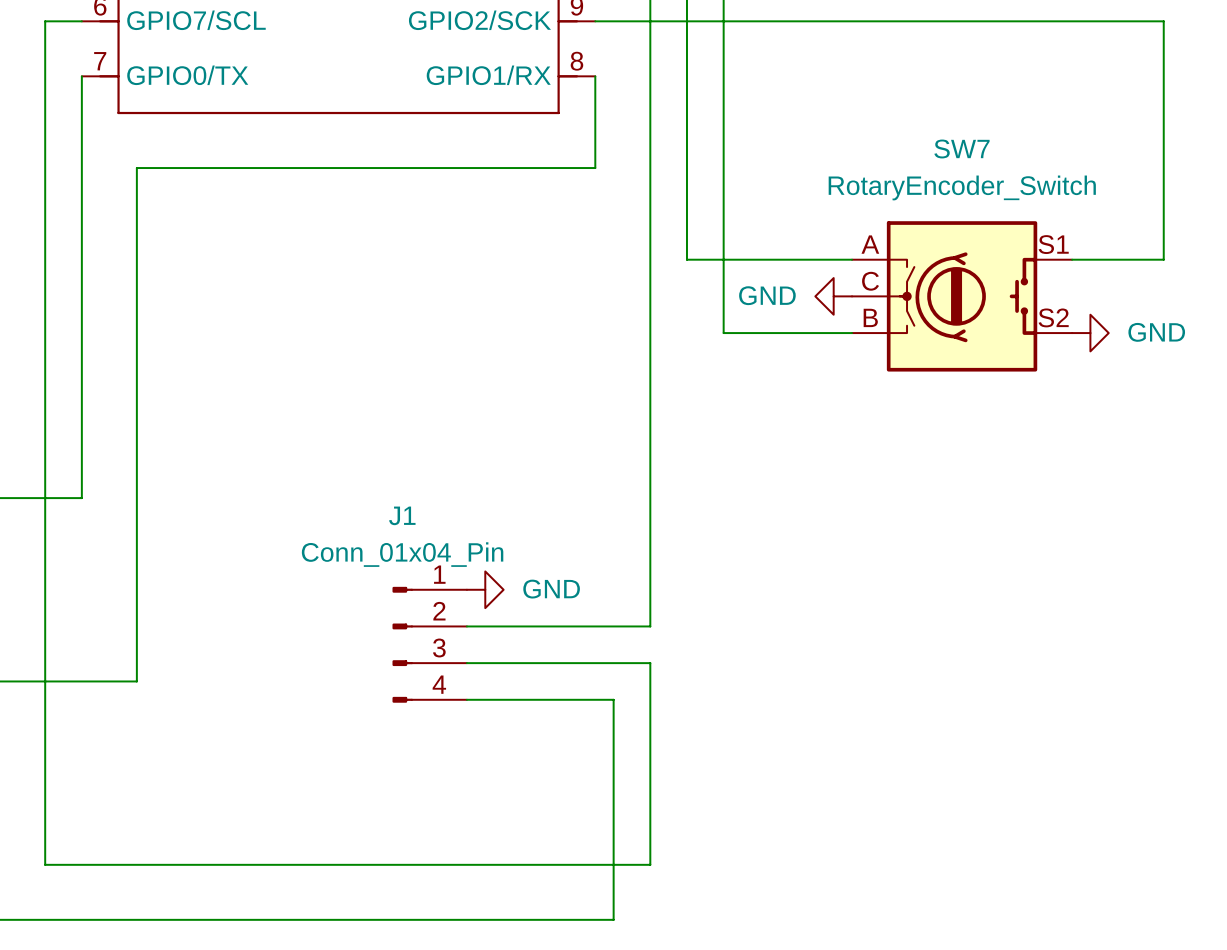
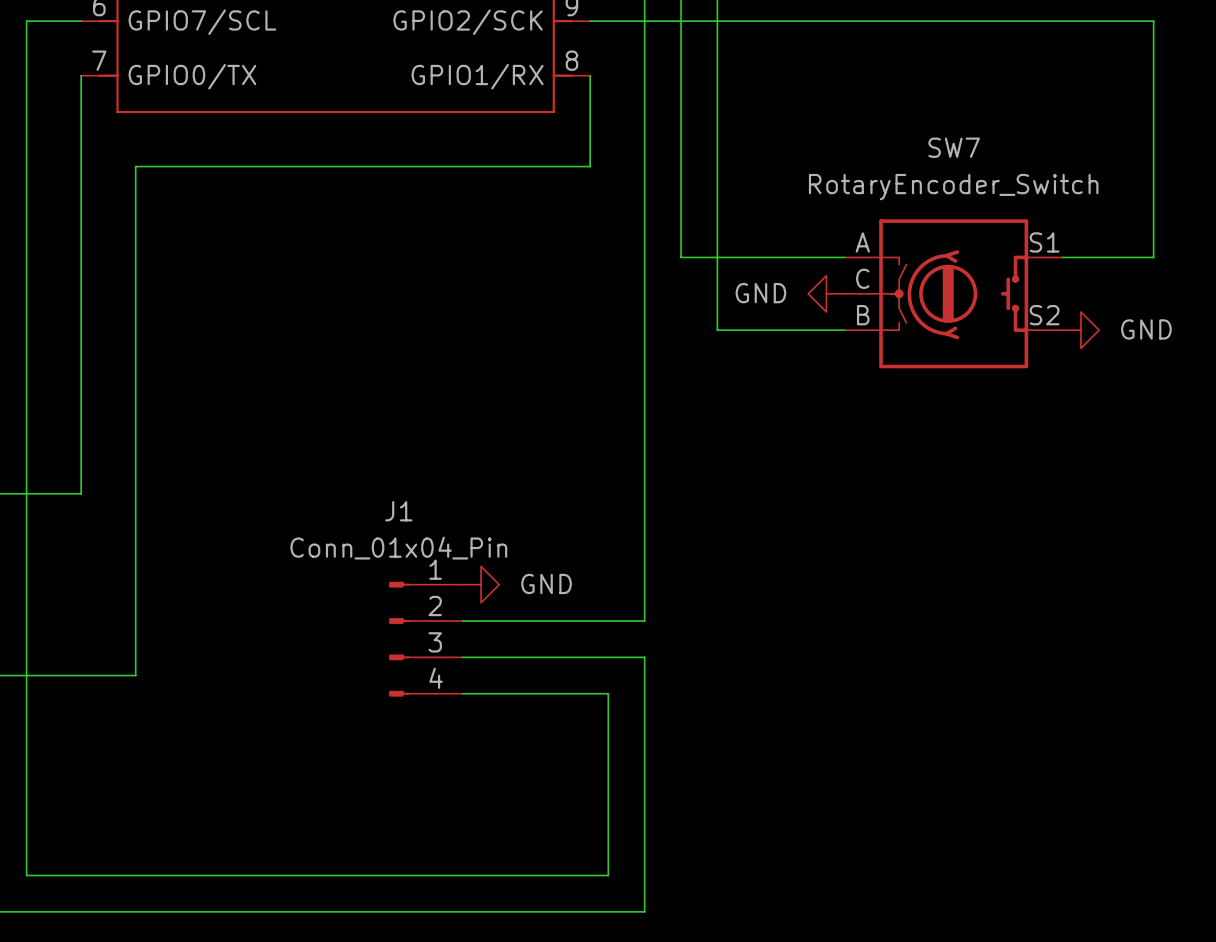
wire: (45, 21) (45, 864) (650, 864) -> (44, 21) (26, 21) (26, 875) (608, 875)
wire: (613, 883) (613, 919) -> (644, 857) (644, 911) (608, 911)

